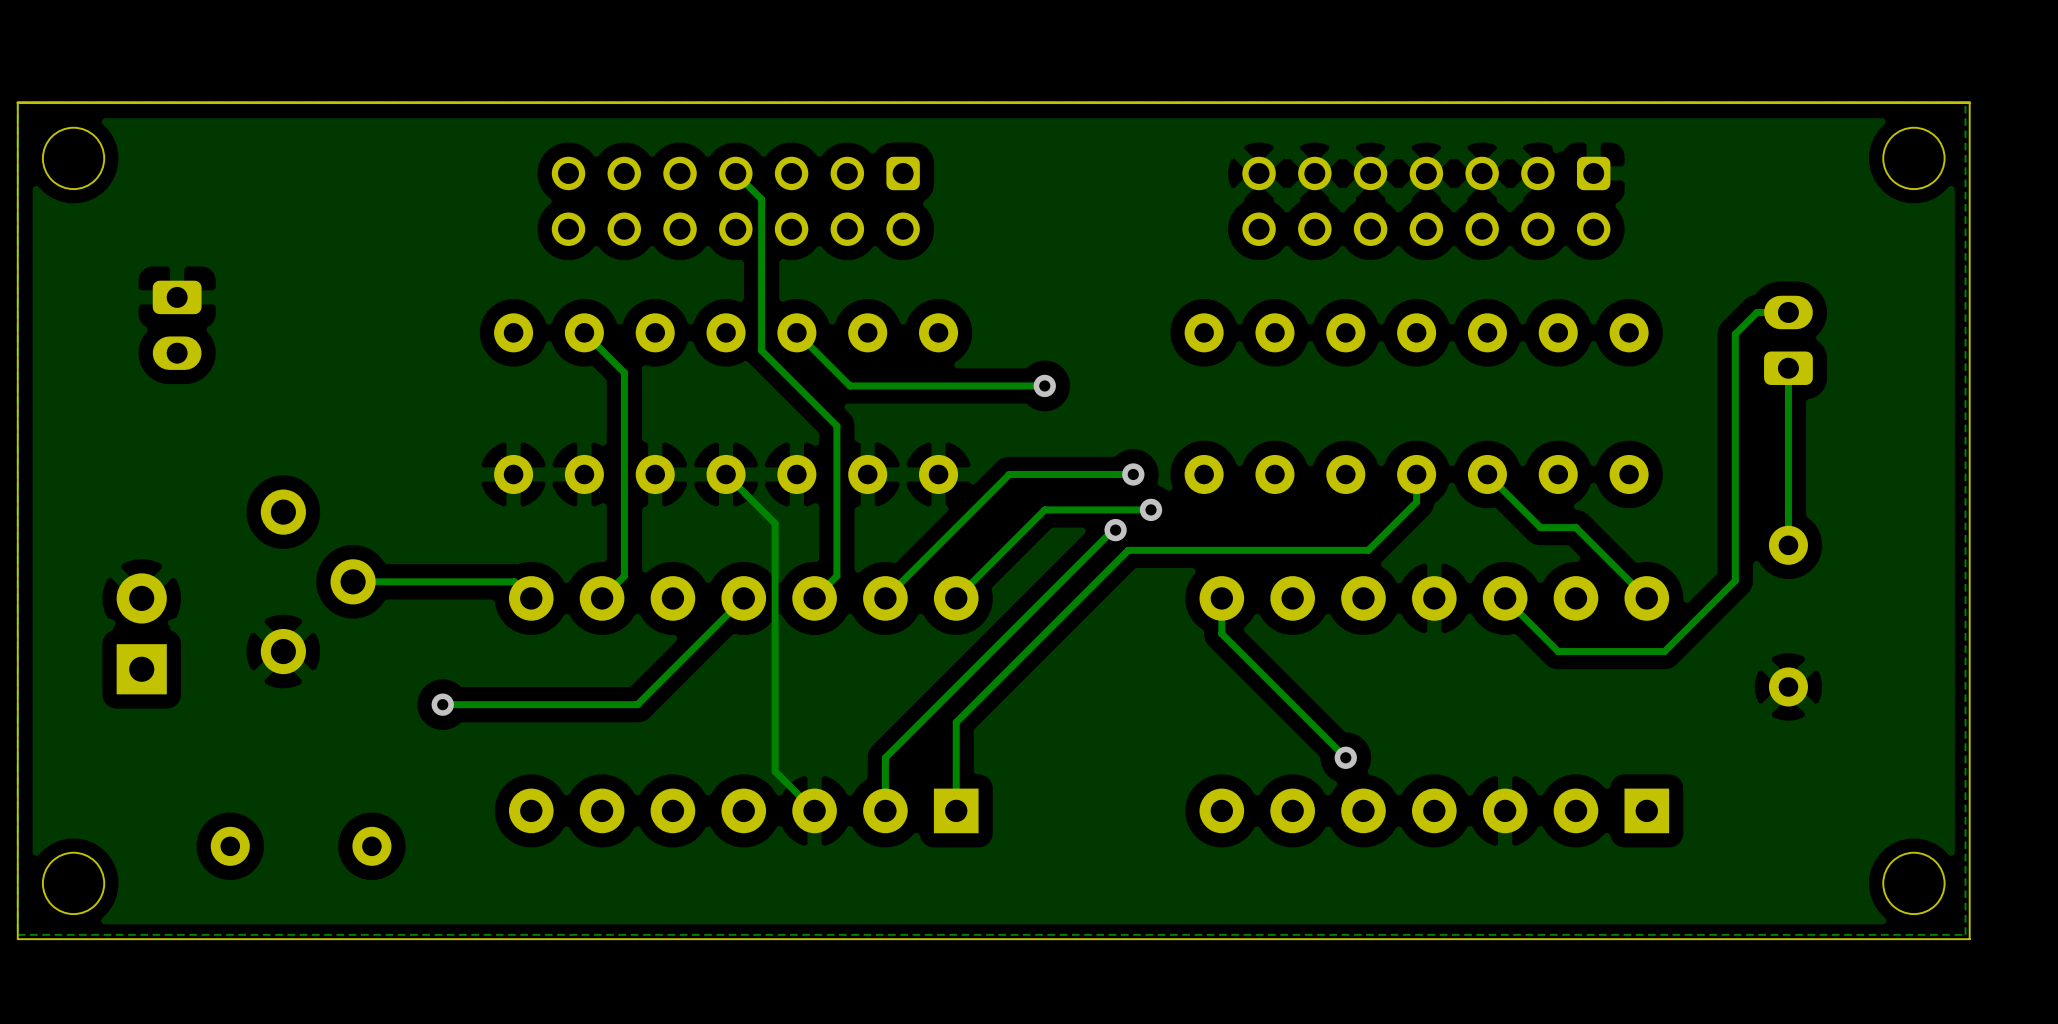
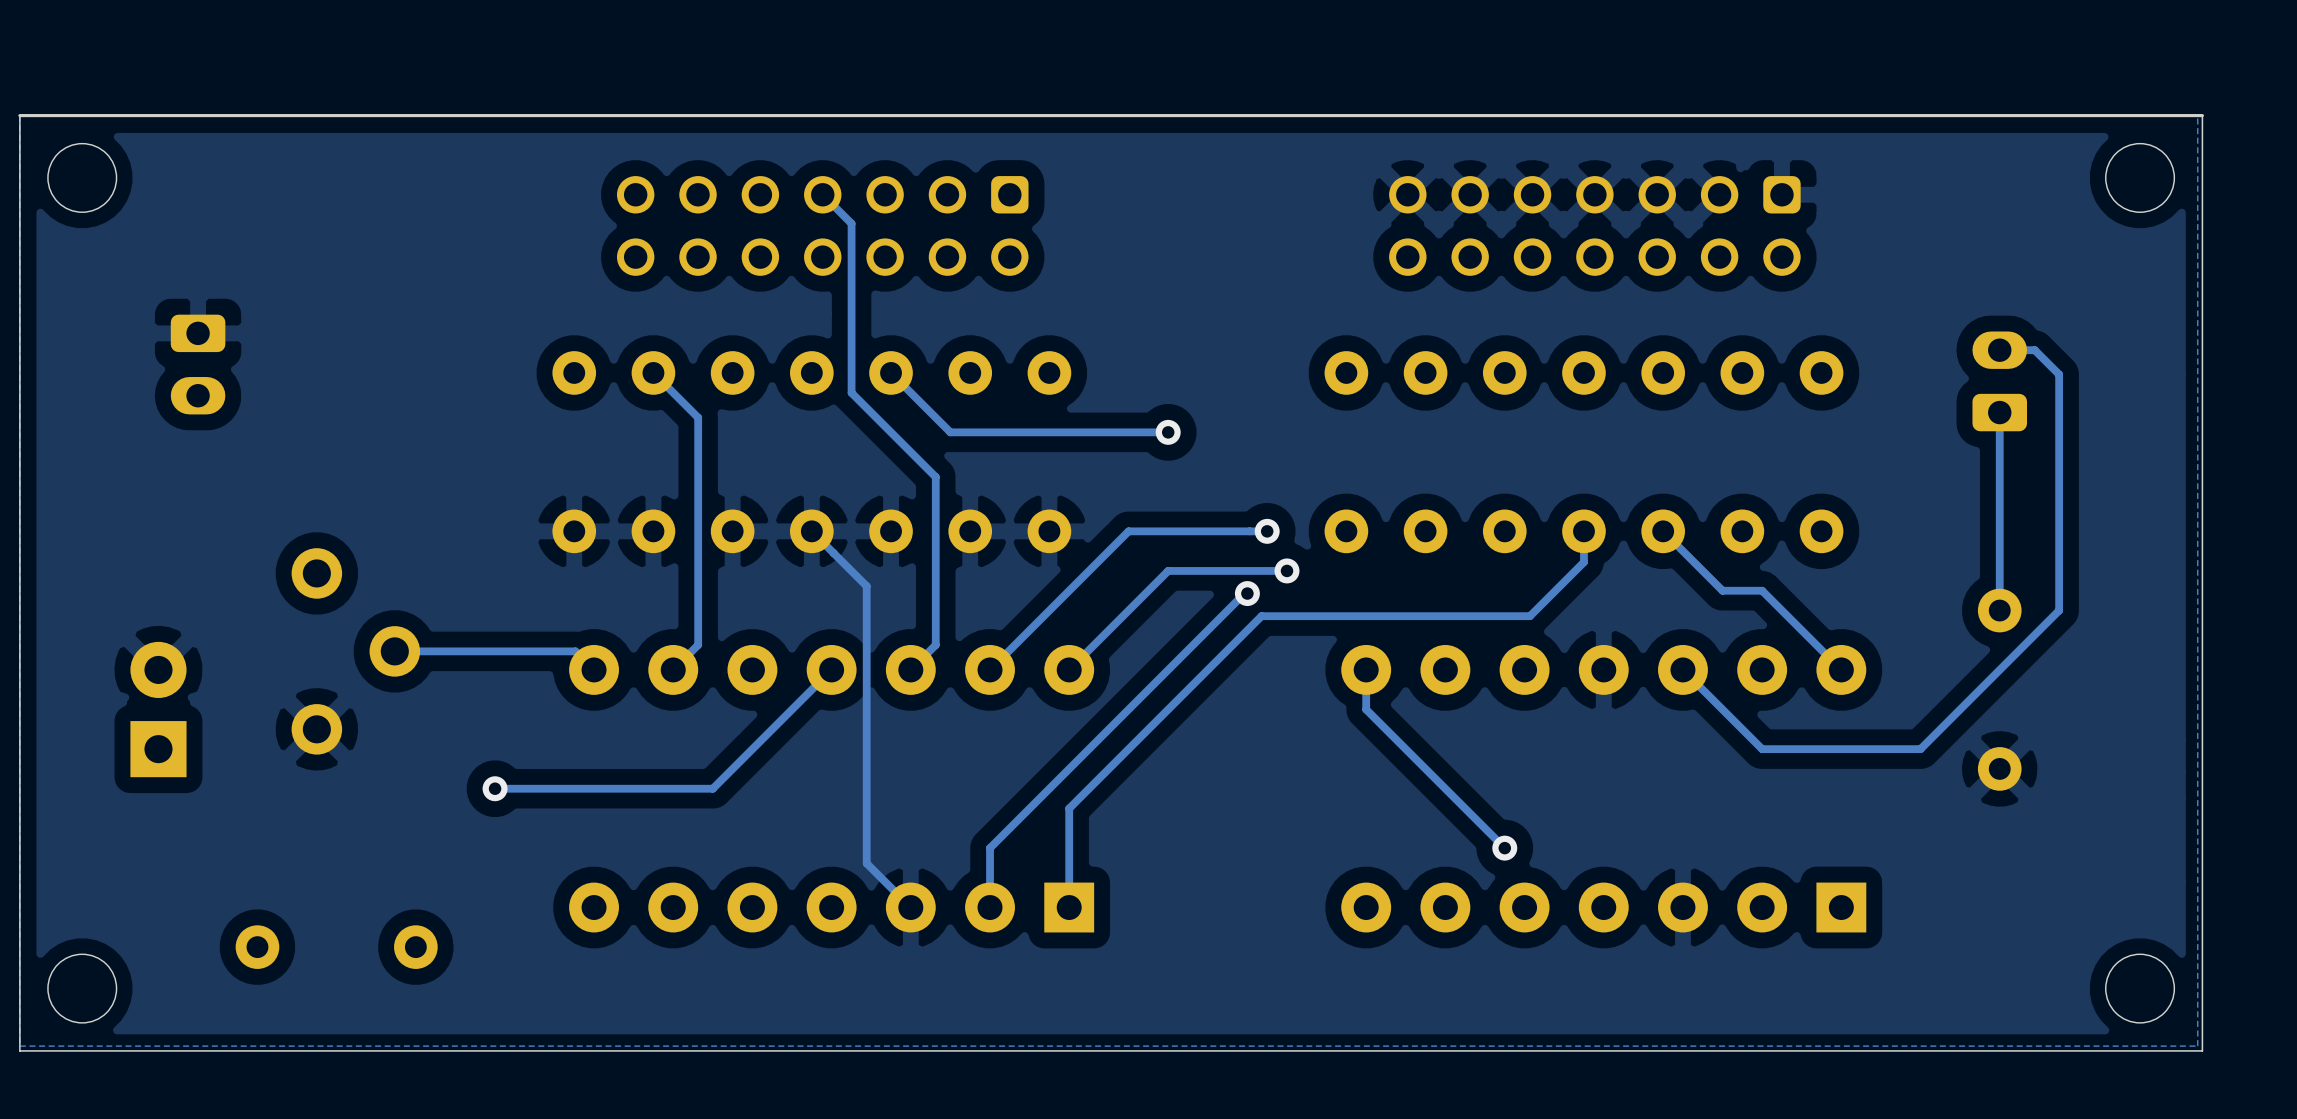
track: (1788, 312) (1757, 312) (1735, 334) (1735, 580) (1664, 651) (1558, 651) -> (1999, 350) (2034, 350) (2059, 374) (2059, 610) (1920, 749) (1762, 749) (1742, 729)

